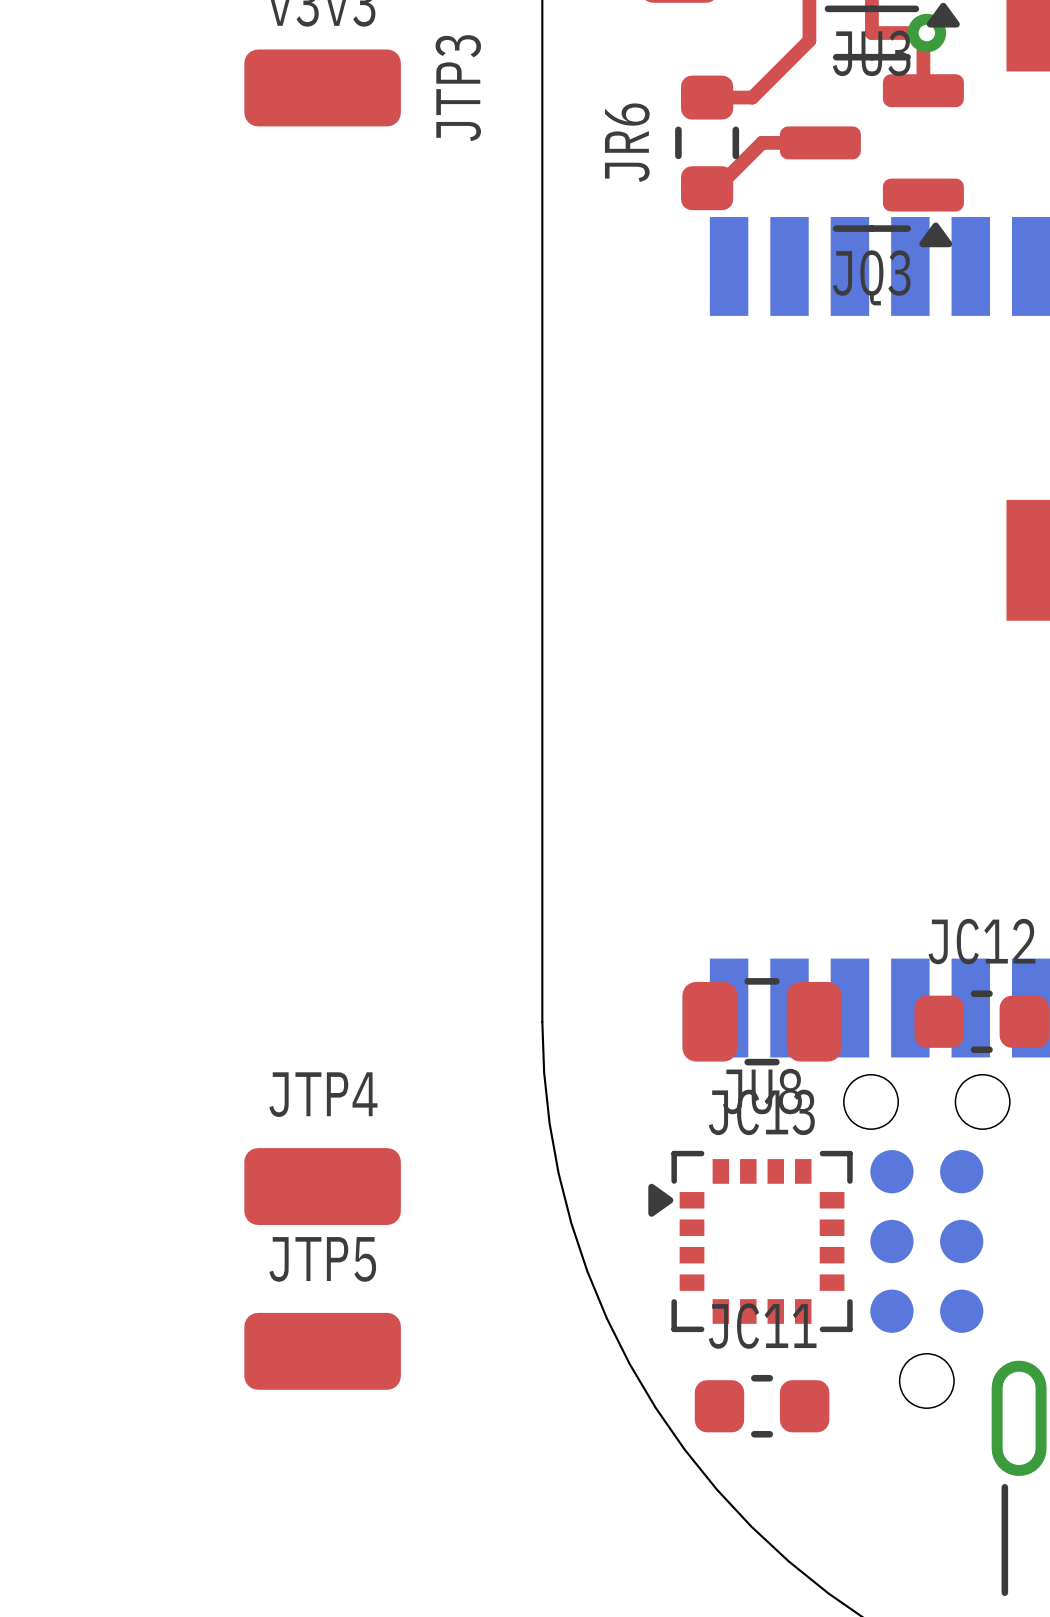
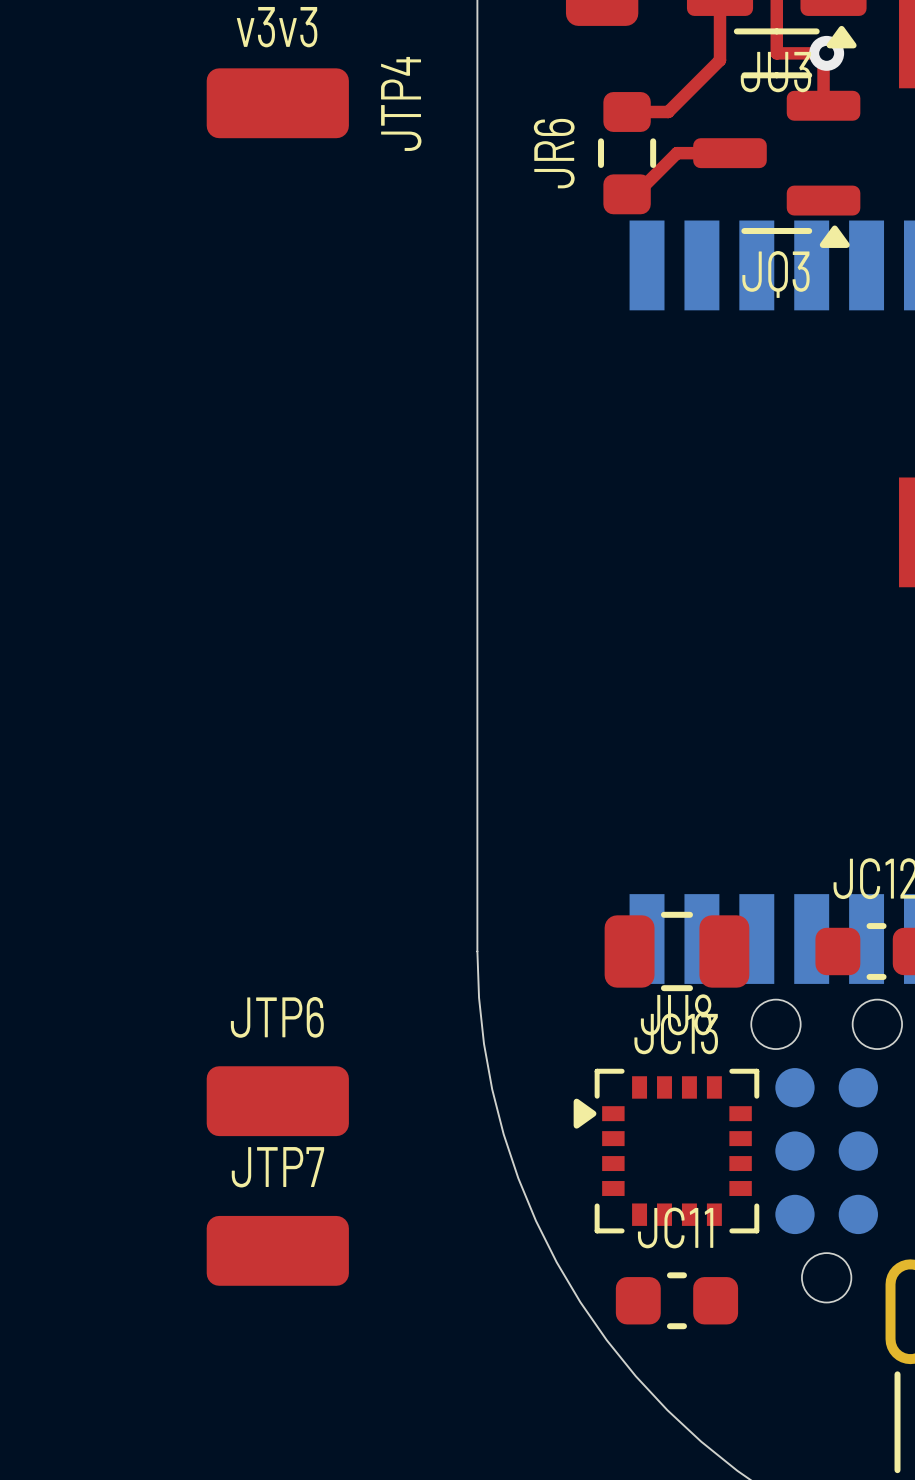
JTP3 name: JTP3 (458, 88) -> JTP4 (401, 103)
JTP4 name: JTP4 (323, 1094) -> JTP6 (277, 1017)
JTP5 name: JTP5 (322, 1259) -> JTP7 (277, 1167)

